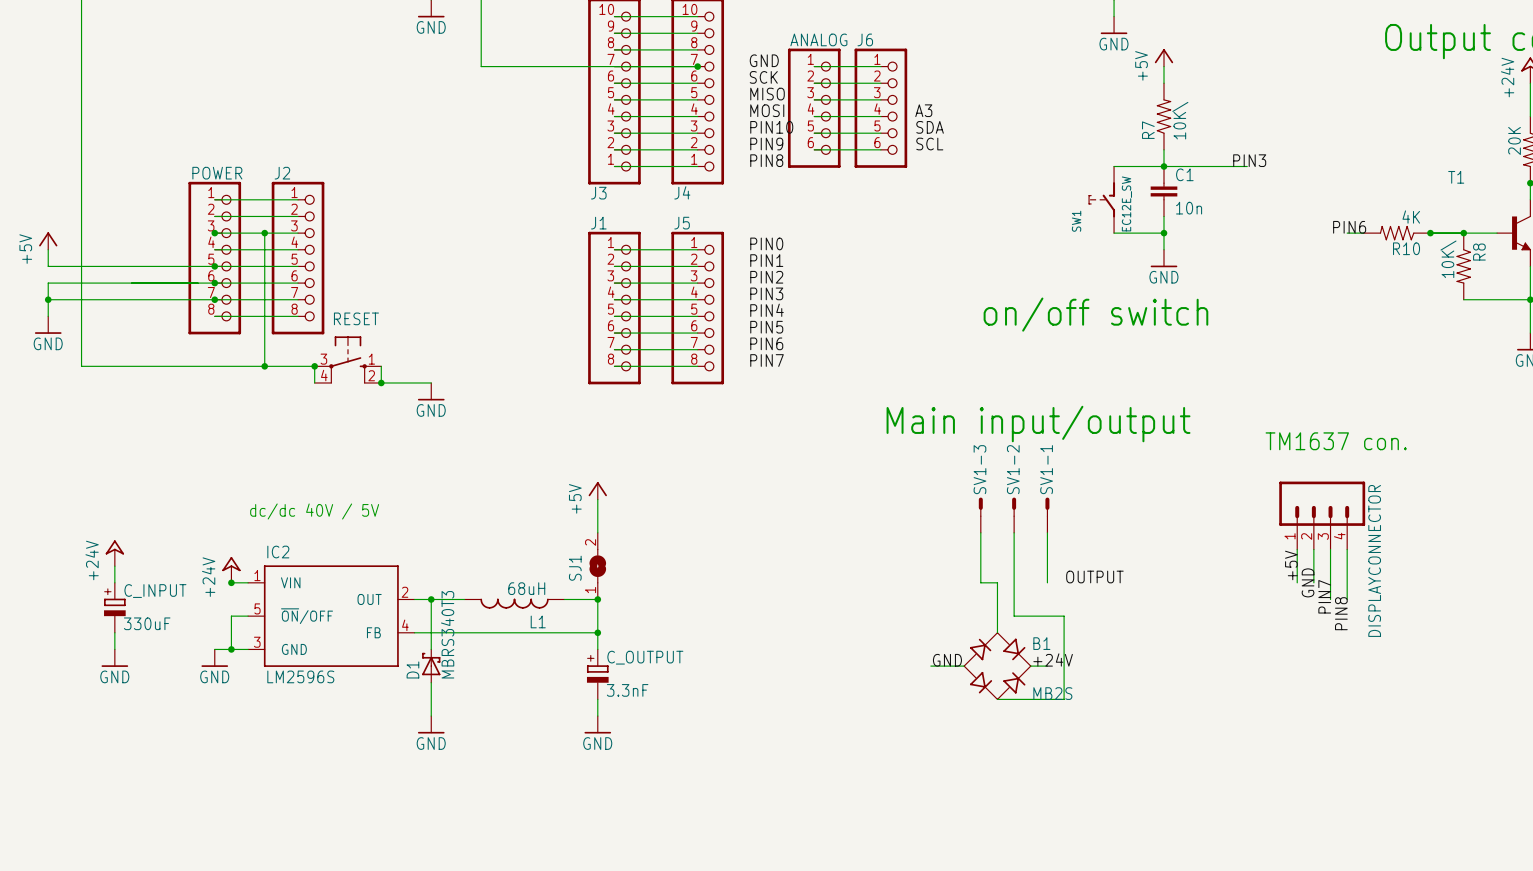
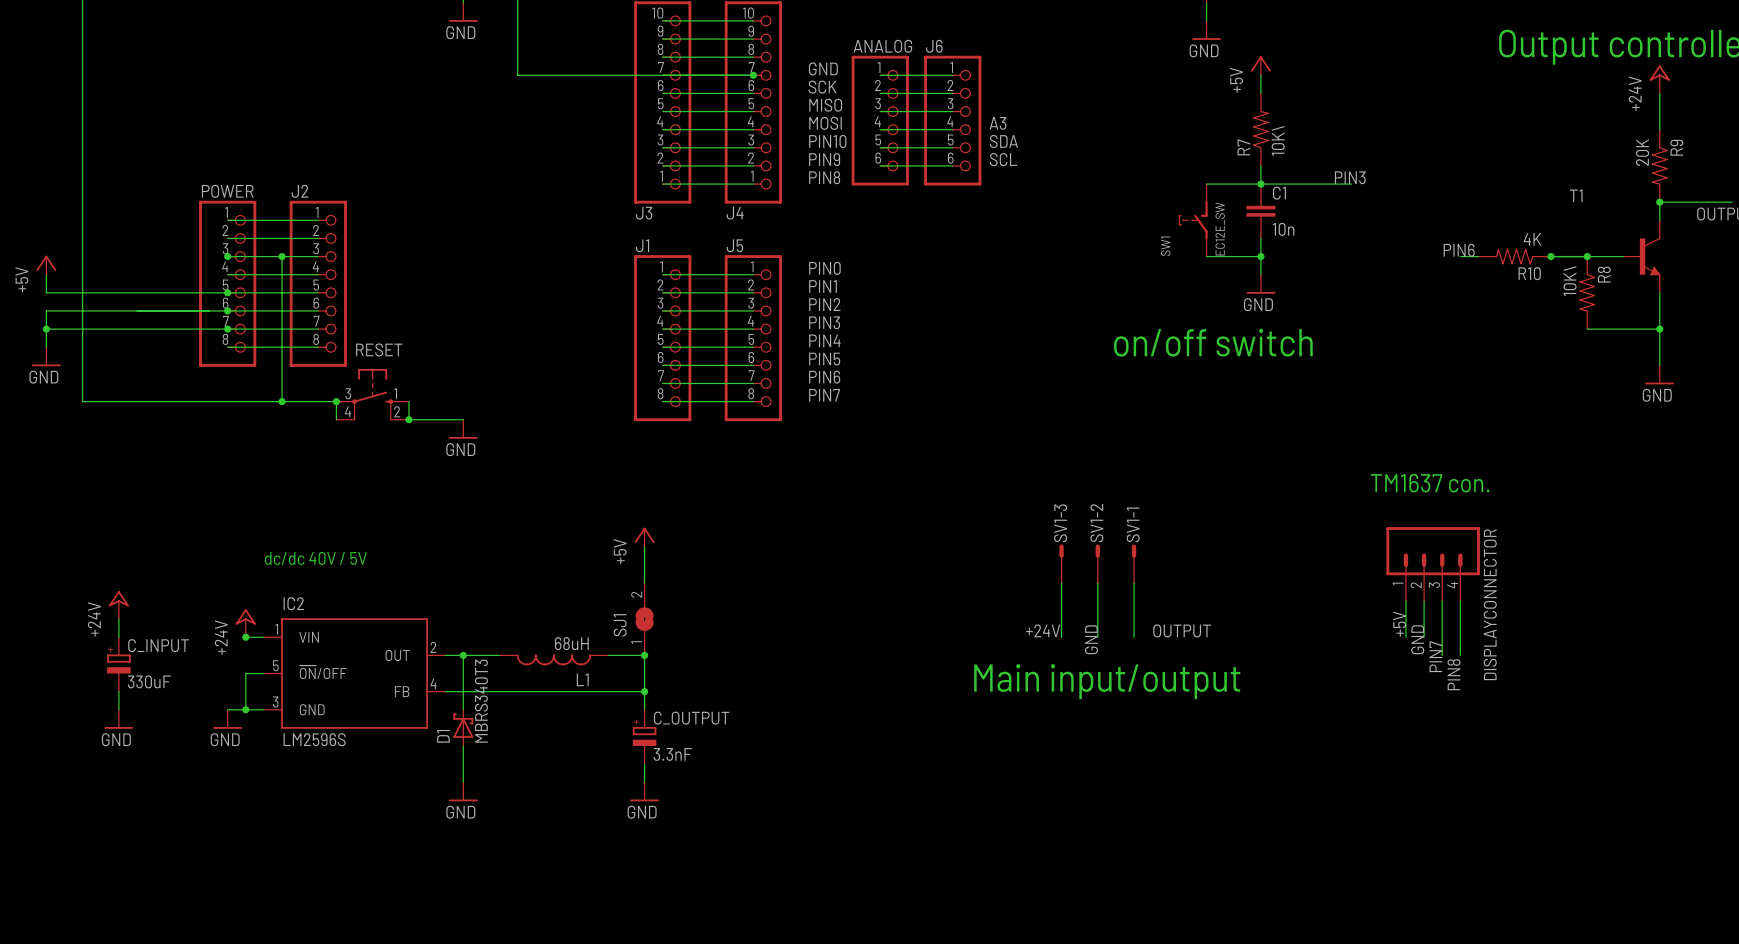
text: Main input/output (1038, 424) -> none
wire: (980, 582) (997, 582) (997, 632) -> none
wire: (1014, 582) (1014, 616) (1064, 616) (1064, 699) (997, 699) -> none
text: none -> Main input/output (1107, 681)
label position: +24V (1053, 659) -> +24V (1043, 630)
label rotation: 0° (947, 660) -> 90° counterclockwise (1091, 639)
label position: GND (947, 660) -> GND (1091, 639)
wire: (930, 666) (964, 666) -> none
B1: MB2S (997, 666) -> none
wire: (1030, 666) (1047, 666) -> none

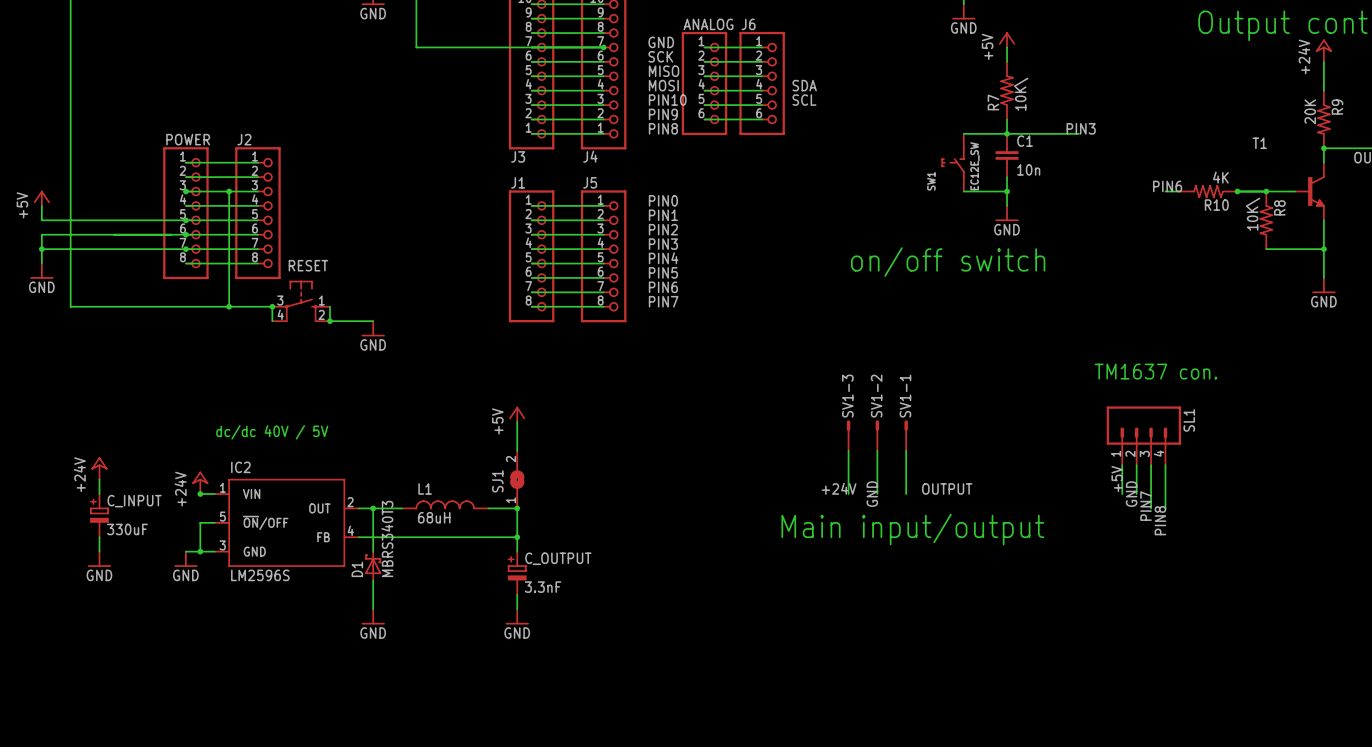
label: A3 (997, 123) -> SDA (804, 85)
label: SDA (1003, 141) -> SCL (804, 100)
label: SCL (1003, 159) -> none
DISPLAYCONNECTOR name: DISPLAYCONNECTOR (1490, 604) -> SL1 (1189, 420)
L1 rotation: 0° (553, 659) -> 180° (445, 504)

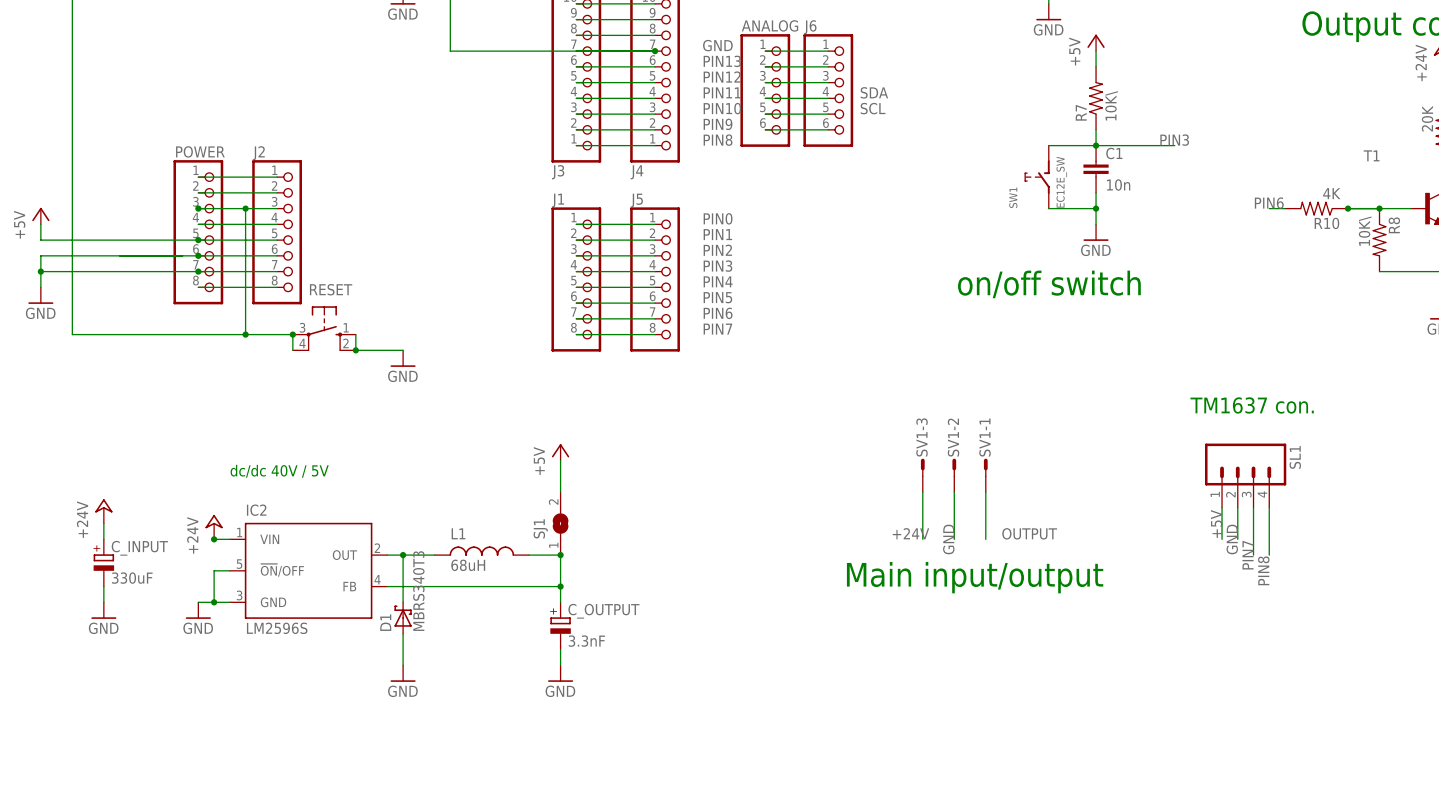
label: SCK (660, 56) -> PIN13 (722, 61)
label: MISO (664, 71) -> PIN12 (722, 77)
label: MOSI (663, 85) -> PIN11 (722, 92)

